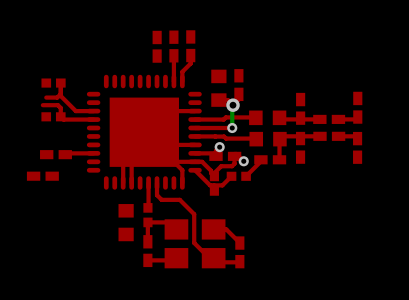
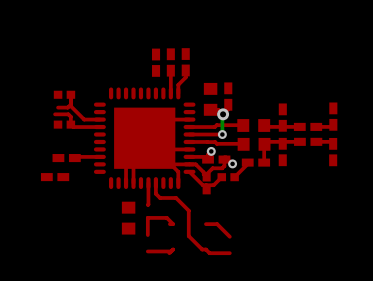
part: (147, 215) -> none
part: (195, 243) -> none
part: (147, 251) -> none
part: (239, 252) -> none

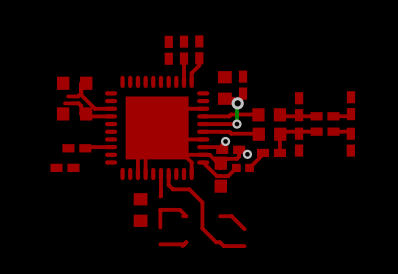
part footprint: [53, 90, 76, 99] -> [56, 76, 93, 90]
part footprint: [53, 120, 76, 129] -> [56, 107, 93, 121]
part footprint: [202, 172, 211, 195] -> [214, 156, 228, 193]

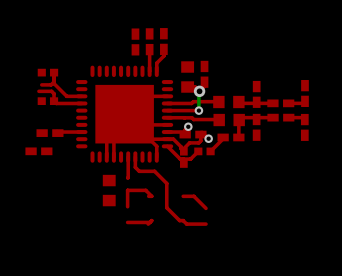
part footprint: [56, 76, 93, 90] -> [37, 68, 59, 77]
part footprint: [56, 107, 93, 121] -> [37, 97, 59, 106]
part footprint: [214, 156, 228, 193] -> [179, 147, 188, 168]

